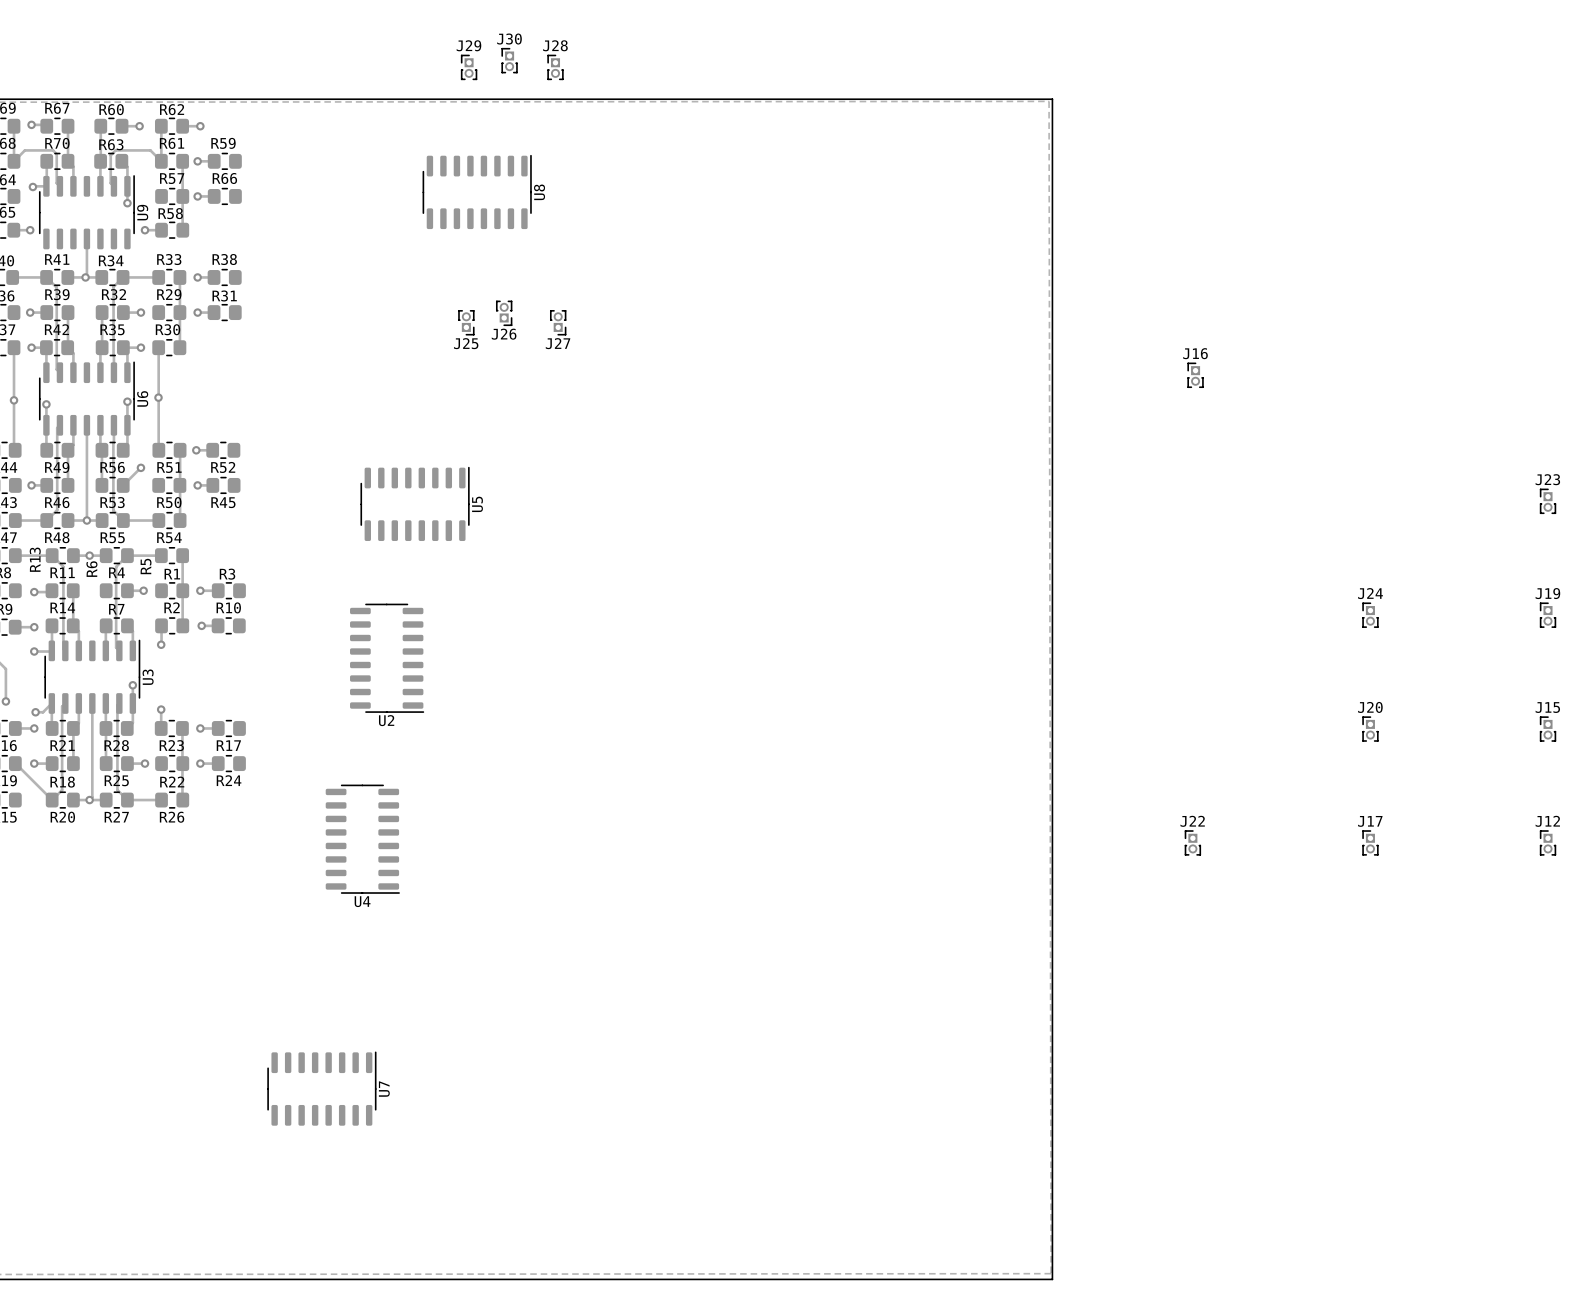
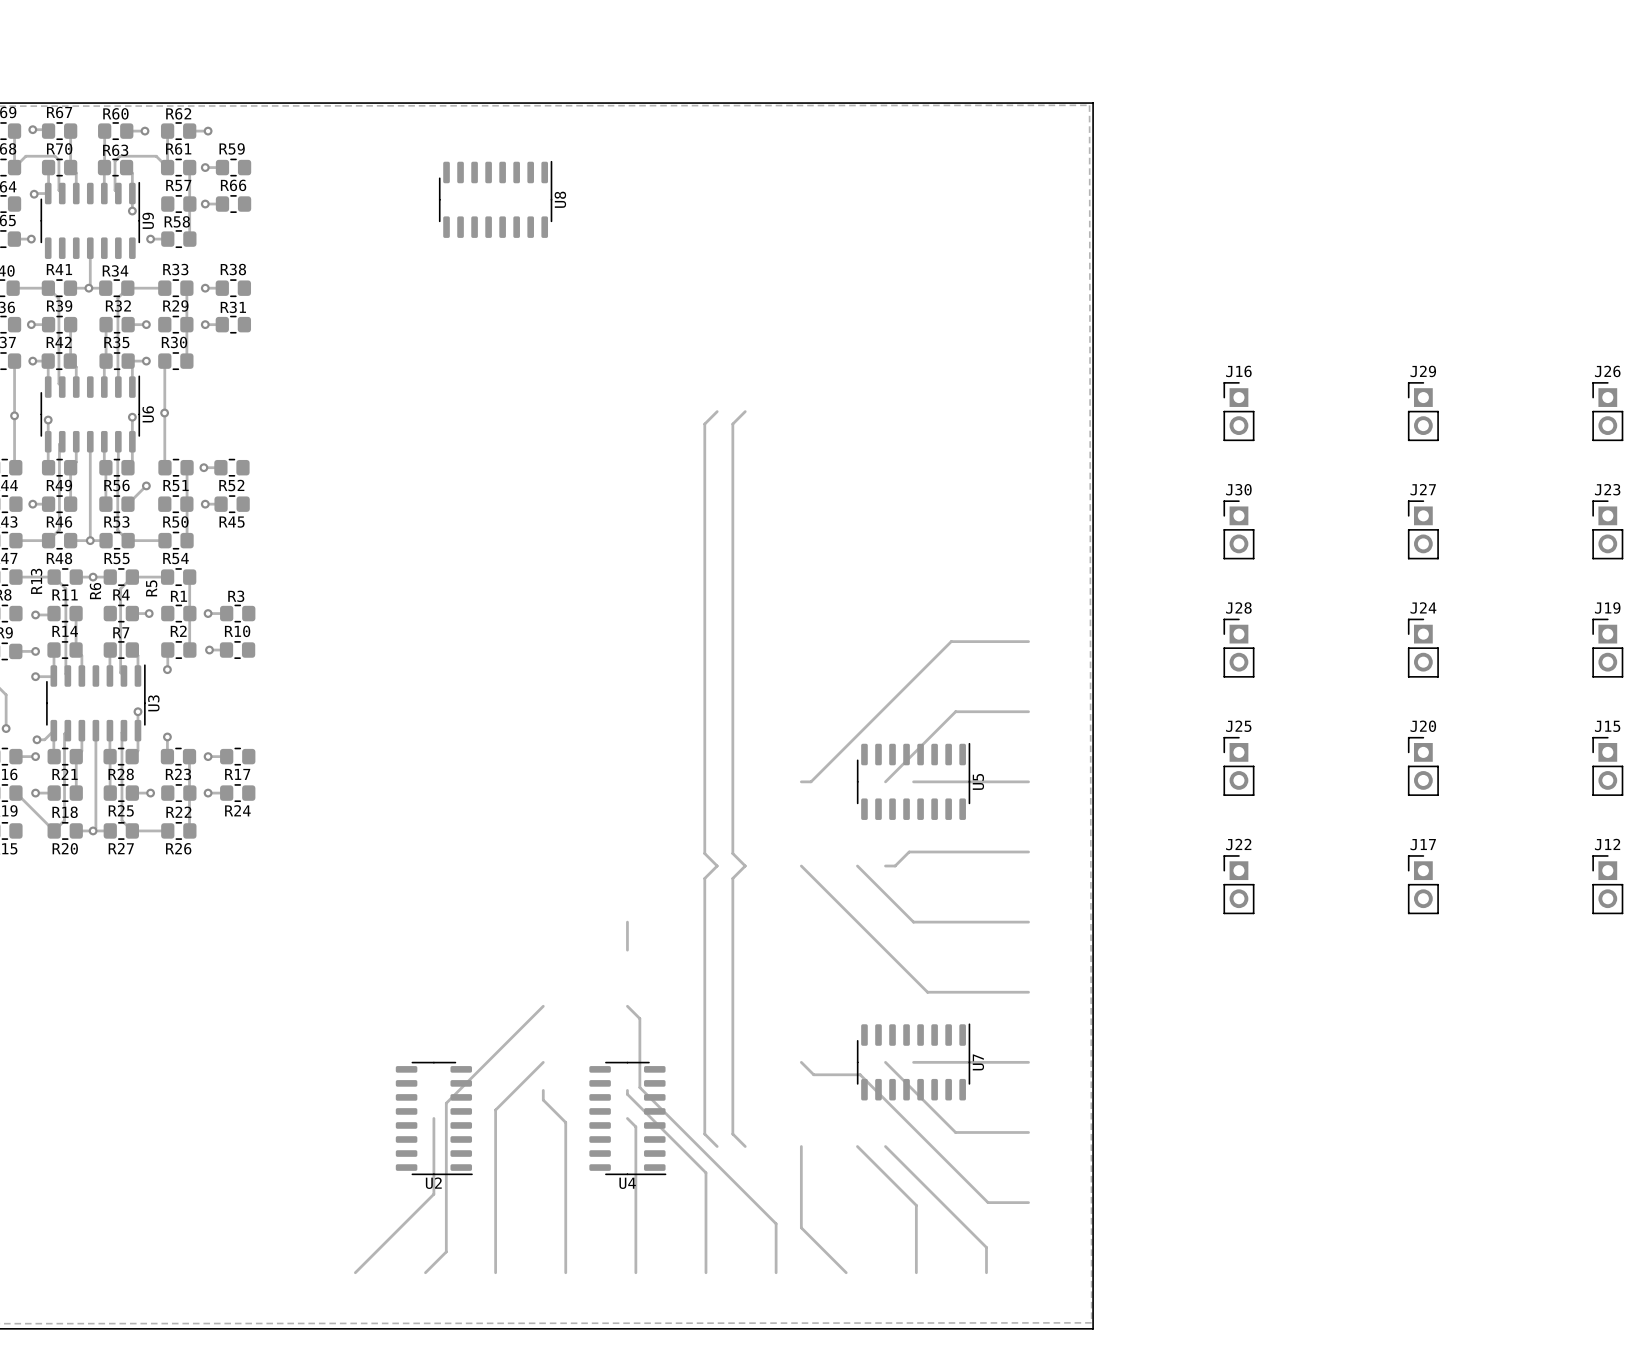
J30 footprint: [501, 48, 518, 74] -> [1223, 500, 1255, 560]
J29 footprint: [461, 54, 478, 80] -> [1408, 382, 1439, 441]
J28 footprint: [547, 54, 564, 80] -> [1223, 618, 1255, 678]
J26 footprint: [496, 300, 513, 326] -> [1592, 382, 1624, 441]
J25 footprint: [458, 310, 475, 336] -> [1223, 737, 1255, 796]
J27 footprint: [550, 310, 567, 336] -> [1408, 500, 1439, 560]
J26 name position: J26 (504, 334) -> J26 (1607, 371)
J25 name position: J25 (466, 343) -> J25 (1238, 726)
J27 name position: J27 (558, 343) -> J27 (1423, 489)
J16 footprint: [1187, 362, 1204, 388] -> [1223, 382, 1255, 441]
track: none -> (717, 411) (704, 424) (704, 853) (717, 866) (704, 878) (704, 1134) (717, 1146)
track: none -> (745, 411) (732, 424) (732, 853) (745, 866) (732, 878) (732, 1134) (745, 1146)
J23 footprint: [1539, 488, 1557, 514] -> [1592, 500, 1624, 560]
U5 position: (415, 504) -> (913, 781)
J24 footprint: [1362, 602, 1379, 628] -> [1408, 618, 1439, 678]
J19 footprint: [1539, 602, 1557, 628] -> [1592, 618, 1624, 678]
track: none -> (1028, 641) (951, 641) (811, 781) (801, 781)
U2 position: (387, 658) -> (434, 1118)
track: none -> (1028, 711) (955, 711) (885, 781)
J20 footprint: [1362, 716, 1379, 742] -> [1408, 737, 1439, 796]
J15 footprint: [1539, 716, 1557, 742] -> [1592, 737, 1624, 796]
track: none -> (913, 781) (1028, 781)
track: none -> (1028, 851) (909, 851) (895, 866) (885, 866)
J22 footprint: [1184, 830, 1201, 856] -> [1223, 855, 1255, 915]
J17 footprint: [1362, 830, 1379, 856] -> [1408, 855, 1439, 915]
J12 footprint: [1539, 830, 1557, 856] -> [1592, 855, 1624, 915]
track: none -> (801, 866) (927, 992) (1028, 992)
track: none -> (857, 866) (913, 922) (1028, 922)
U4 position: (362, 839) -> (627, 1118)
track: none -> (627, 922) (627, 950)
track: none -> (543, 1006) (446, 1103) (446, 1251) (425, 1272)
track: none -> (627, 1006) (639, 1018) (639, 1087) (776, 1223) (776, 1272)
track: none -> (543, 1062) (495, 1110) (495, 1272)
track: none -> (801, 1062) (813, 1074) (860, 1074) (988, 1202) (1028, 1202)
track: none -> (885, 1062) (955, 1132) (1028, 1132)
track: none -> (913, 1062) (1028, 1062)
track: none -> (543, 1090) (543, 1100) (565, 1122) (565, 1272)
track: none -> (627, 1090) (627, 1094) (705, 1172) (705, 1272)
track: none -> (433, 1118) (433, 1194) (355, 1272)
track: none -> (627, 1118) (635, 1126) (635, 1272)
U7 position: (321, 1088) -> (913, 1062)
track: none -> (801, 1146) (801, 1227) (846, 1272)
track: none -> (857, 1146) (916, 1205) (916, 1272)
track: none -> (885, 1146) (986, 1247) (986, 1272)

